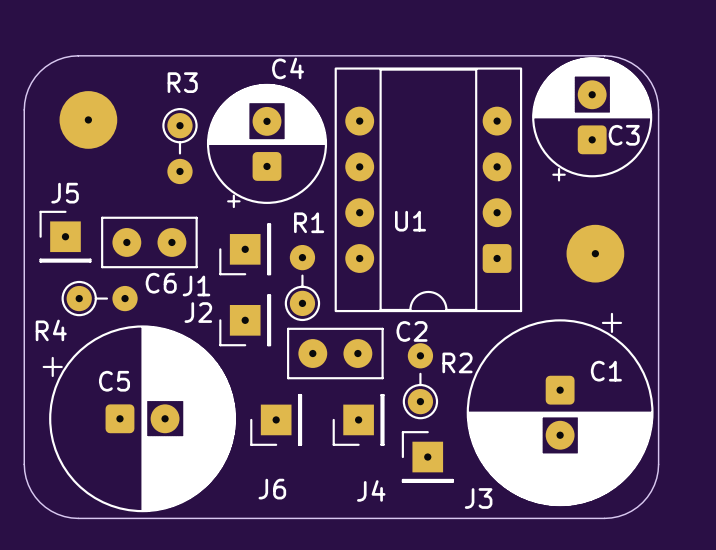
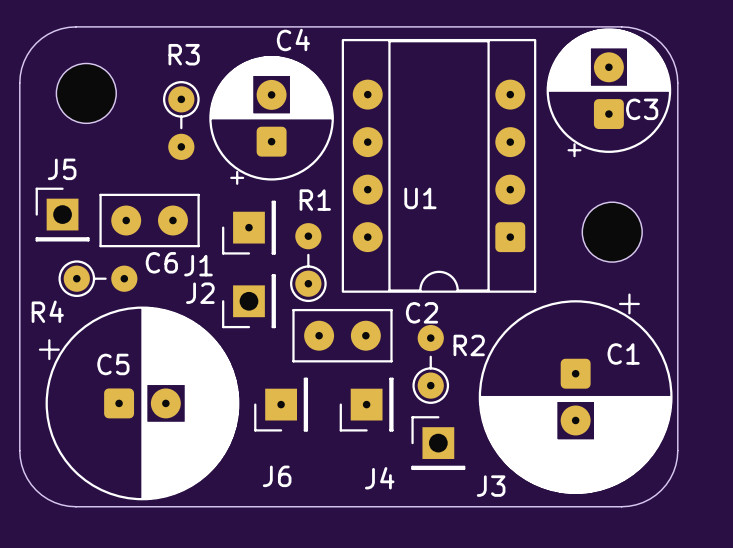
part footprint: [59, 91, 118, 149] -> [56, 63, 117, 124]
J5 footprint: [39, 210, 92, 263] -> [35, 187, 90, 242]
part footprint: [566, 224, 625, 283] -> [582, 202, 643, 263]
J2 footprint: [219, 294, 272, 347] -> [222, 274, 276, 329]
J3 footprint: [401, 431, 454, 483] -> [411, 416, 466, 471]

